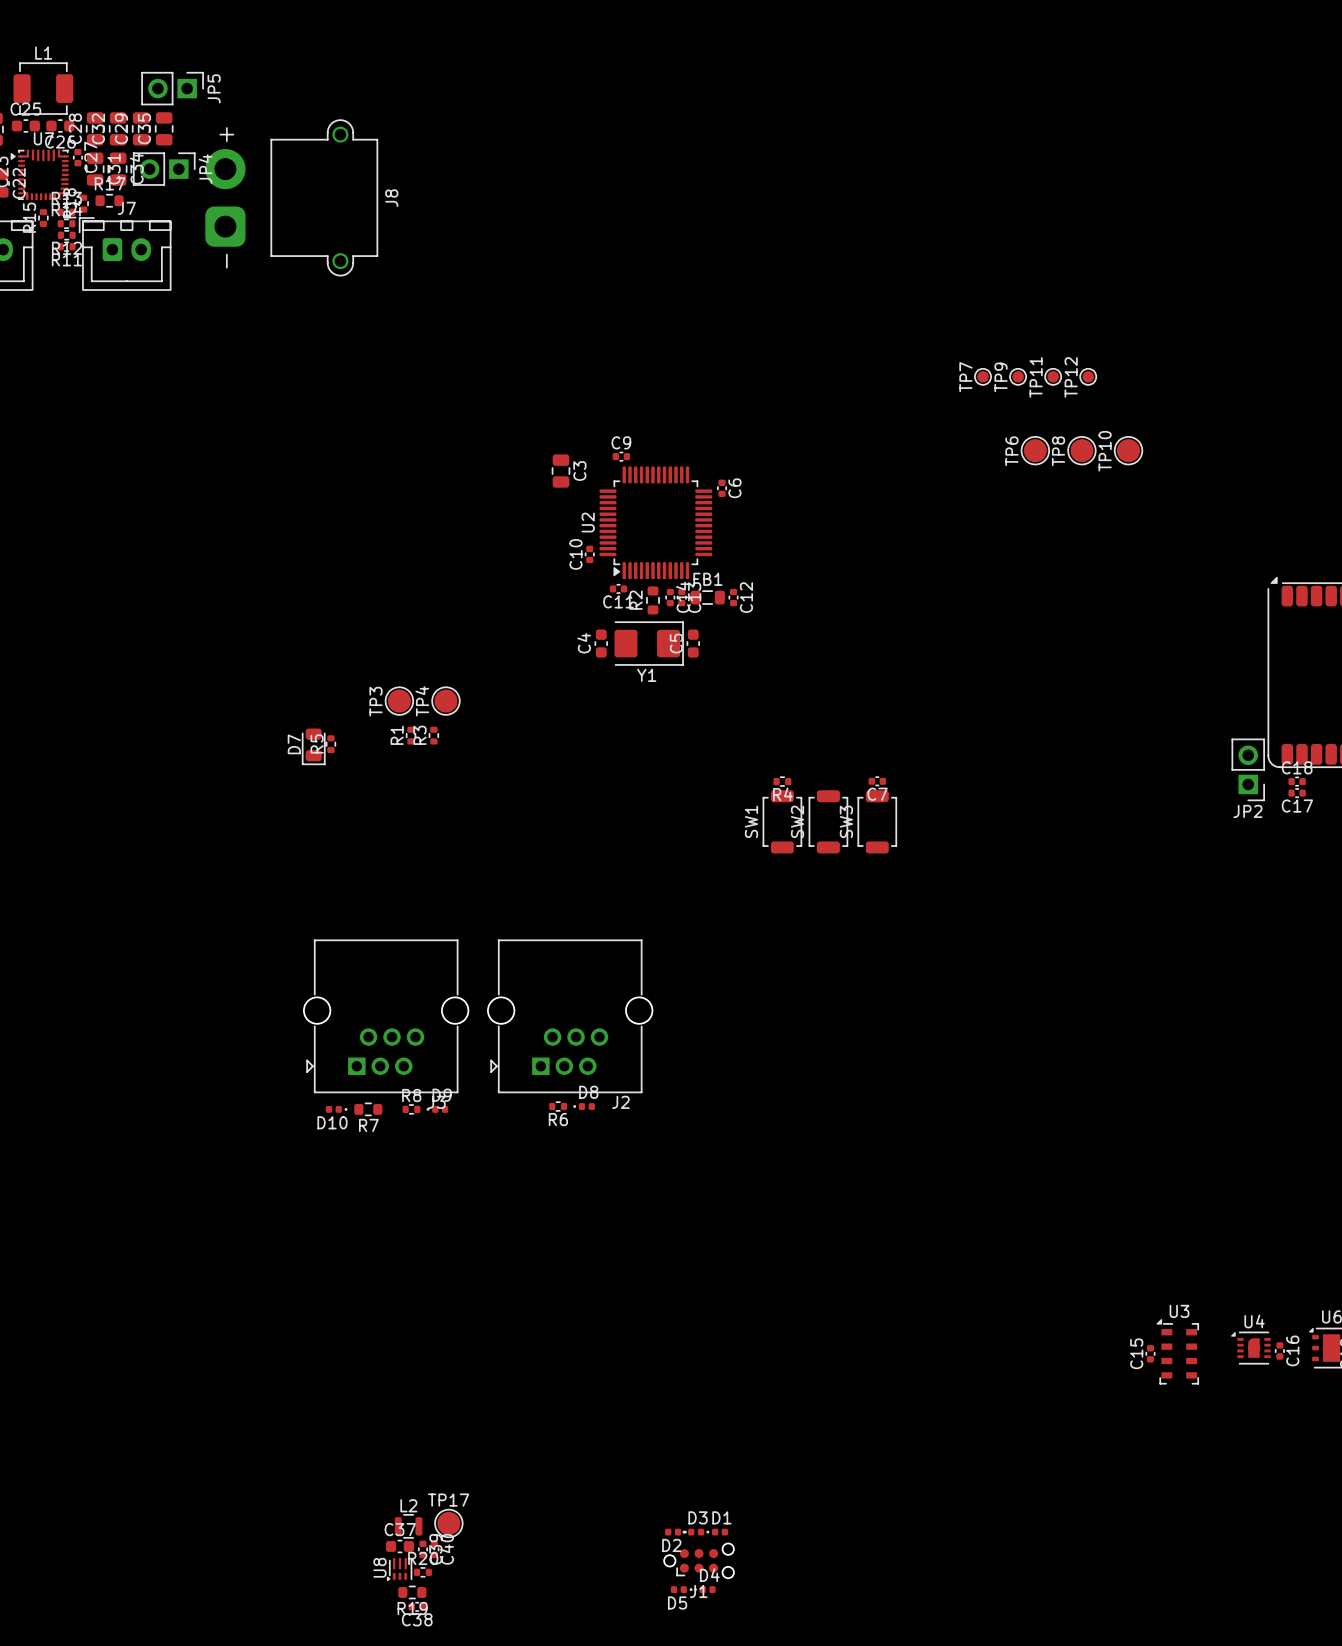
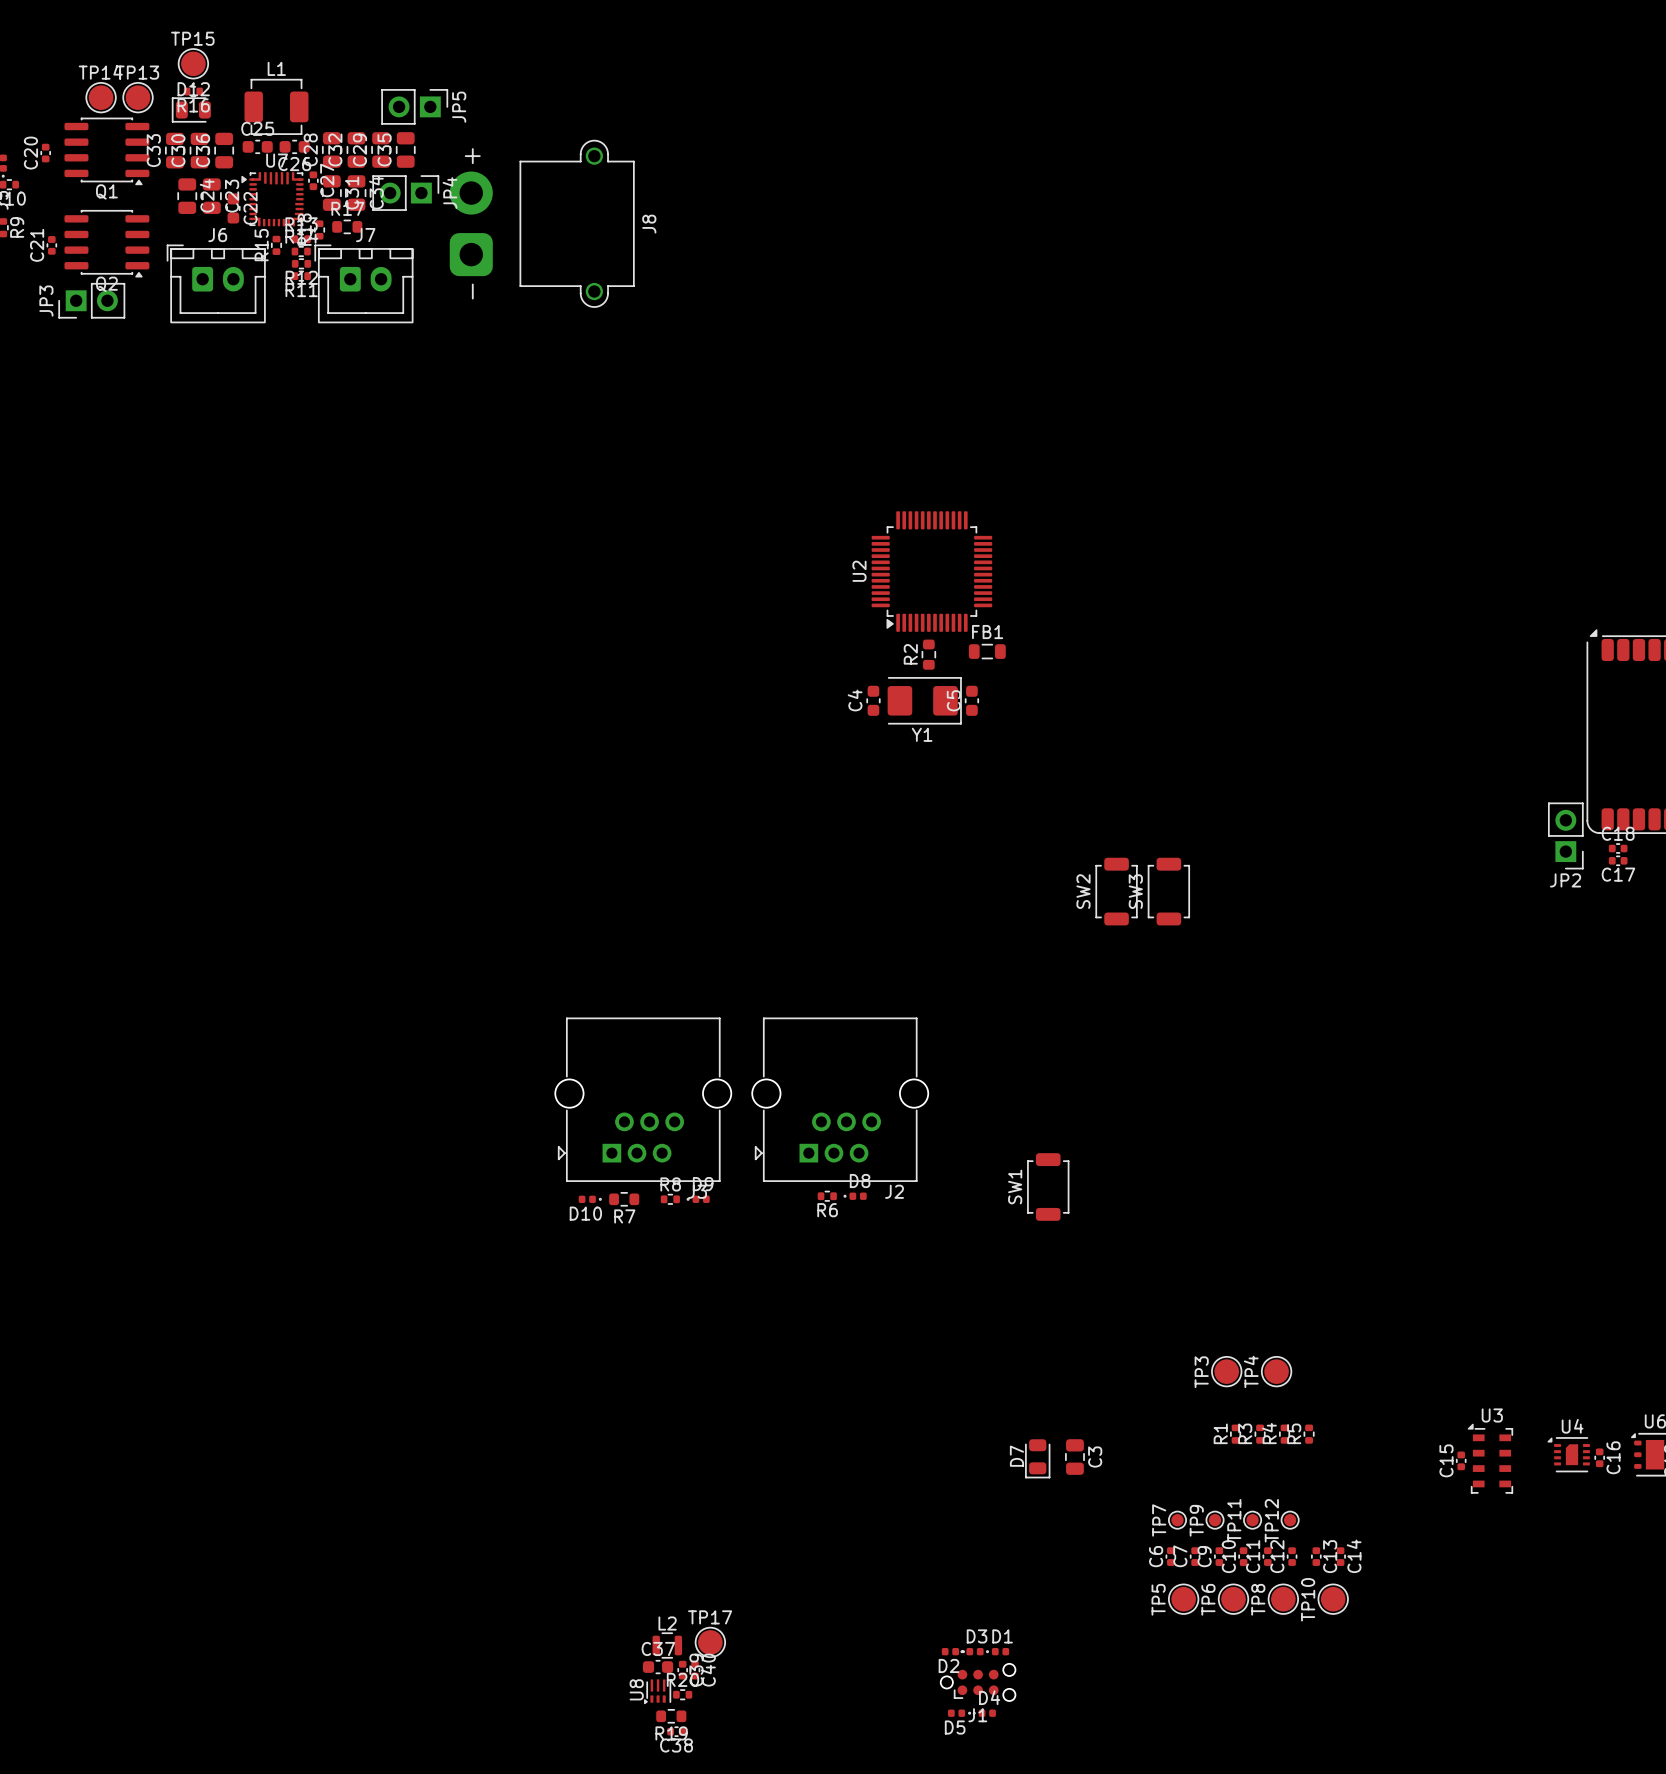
TP7 position: (983, 376) -> (1177, 1520)
TP9 position: (1018, 376) -> (1215, 1520)
TP11 position: (1053, 376) -> (1252, 1520)
TP12 position: (1088, 376) -> (1290, 1520)
TP6 position: (1035, 450) -> (1233, 1599)
TP8 position: (1081, 450) -> (1283, 1599)
TP10 position: (1128, 450) -> (1333, 1599)
C9 rotation: 0° (621, 456) -> 90° clockwise (1219, 1556)
C9 position: (621, 456) -> (1219, 1556)
C3 position: (560, 471) -> (1074, 1457)
C6 position: (722, 488) -> (1170, 1556)
C6 name position: C6 (734, 488) -> C6 (1156, 1556)
C10 position: (589, 554) -> (1243, 1556)
C11 rotation: 0° (618, 588) -> 90° clockwise (1267, 1556)
C11 position: (618, 588) -> (1267, 1556)
C14 position: (670, 597) -> (1340, 1556)
C13 position: (681, 597) -> (1316, 1556)
C12 position: (733, 597) -> (1292, 1556)
C12 name position: C12 (746, 597) -> C12 (1277, 1556)
TP3 position: (399, 701) -> (1226, 1371)
TP4 position: (445, 701) -> (1276, 1371)
R1 position: (411, 735) -> (1235, 1434)
R3 position: (433, 735) -> (1260, 1434)
R5 position: (330, 744) -> (1309, 1434)
D7 position: (313, 746) -> (1037, 1458)
R4 rotation: 0° (782, 781) -> 90° clockwise (1284, 1434)
R4 position: (782, 781) -> (1284, 1434)
C7 rotation: 0° (877, 781) -> 90° clockwise (1195, 1556)
C7 position: (877, 781) -> (1195, 1556)
SW1 position: (782, 821) -> (1048, 1187)
TP5: none -> (1183, 1599)

